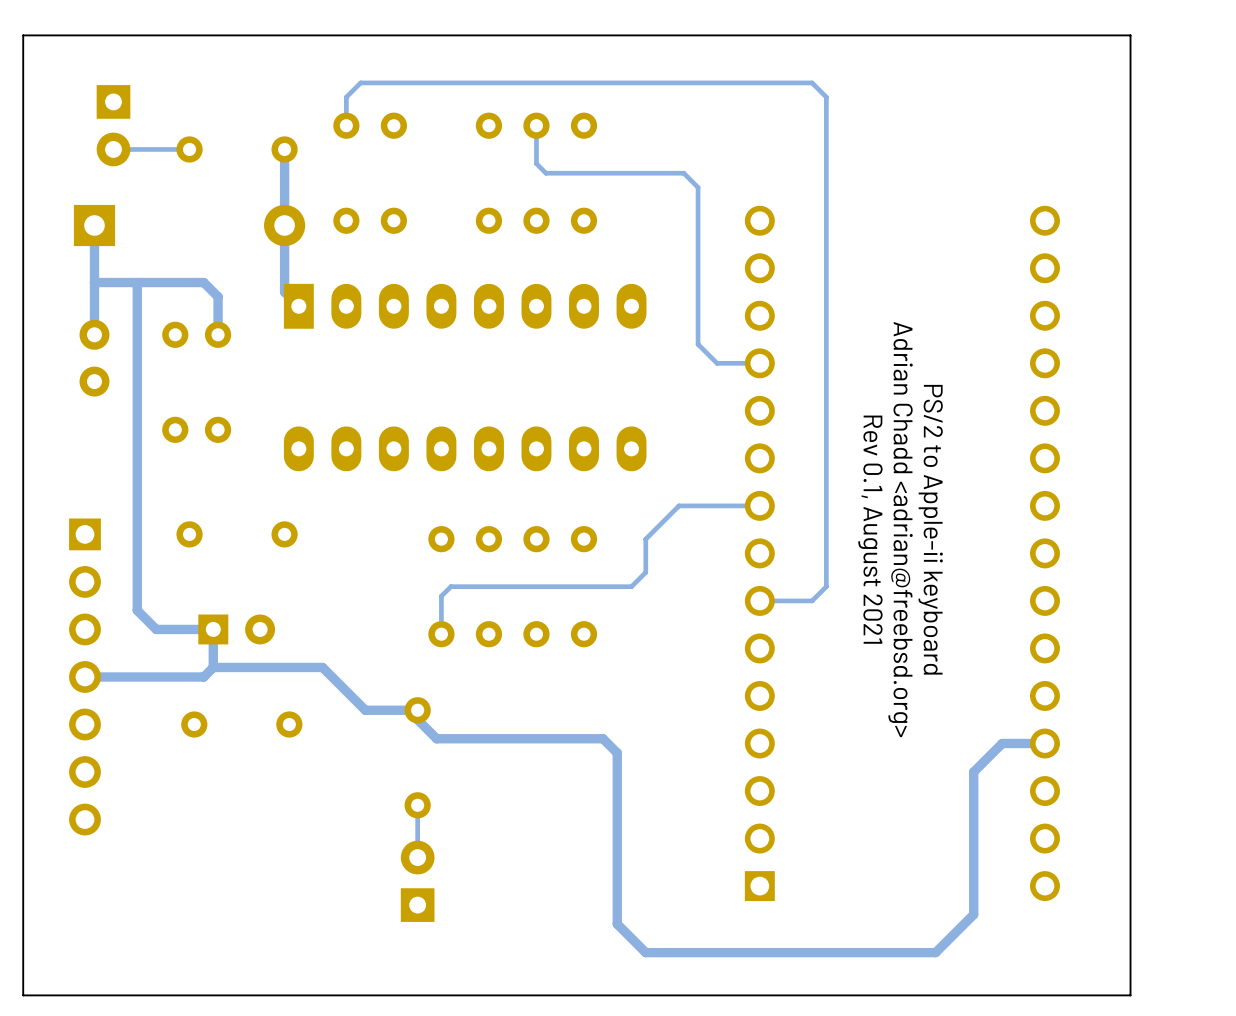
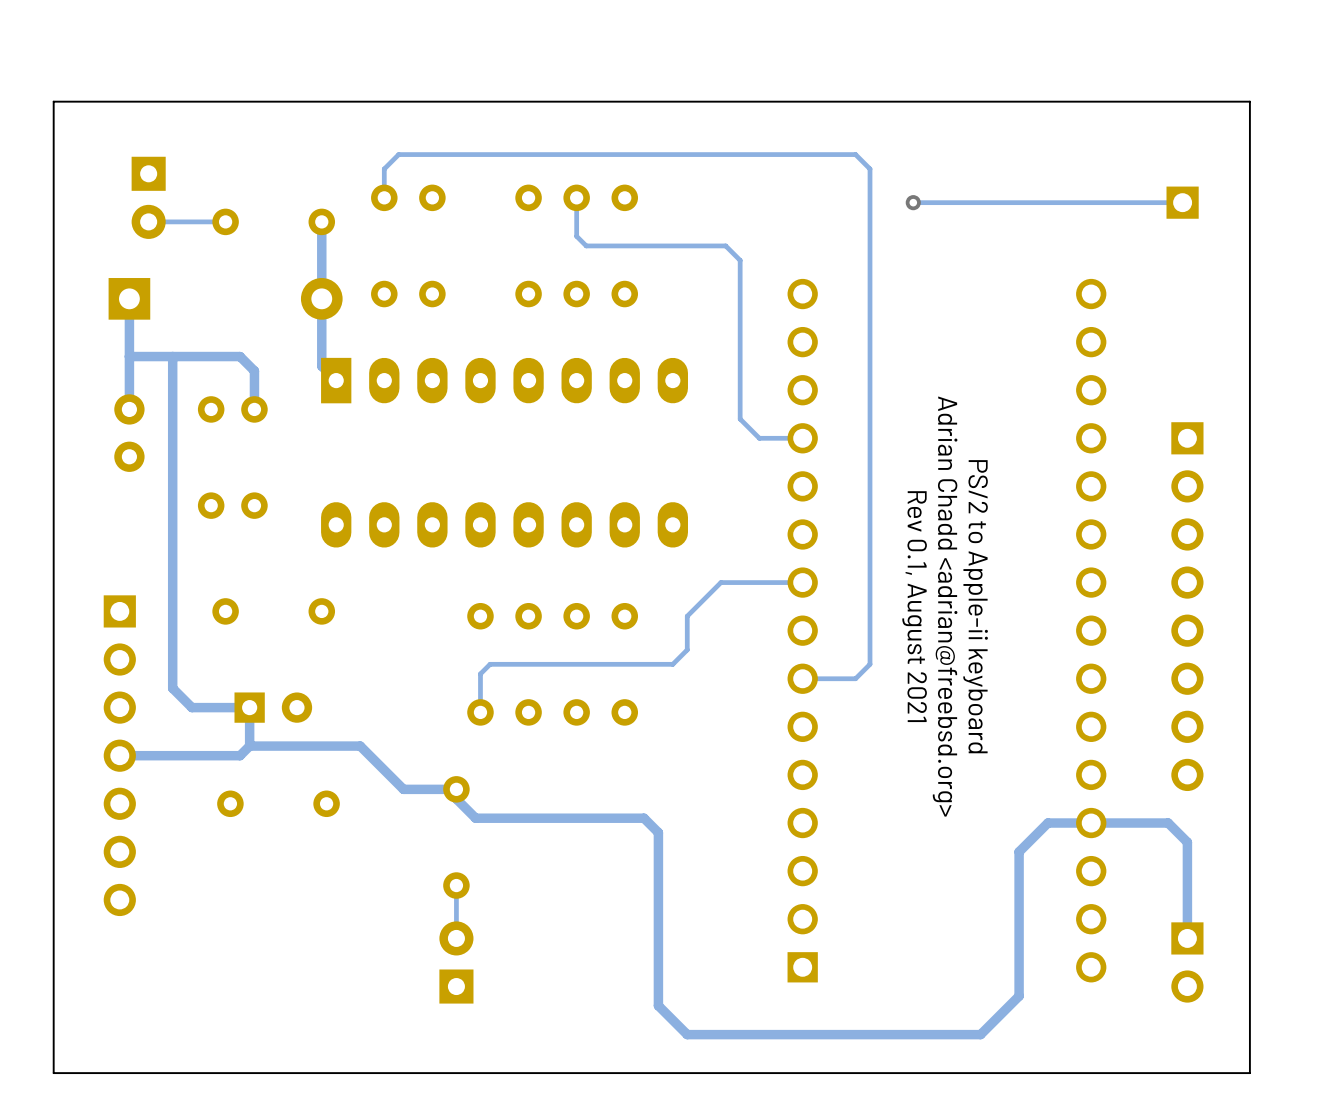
board edge: (1130, 35) (23, 35) (23, 995) (1130, 995) (1130, 35) -> (1249, 101) (1249, 1073) (53, 1073) (53, 101) (1249, 101)
via: none -> (913, 202)
track: none -> (1182, 202) (913, 202)
part: none -> (1182, 202)
part: none -> (1187, 606)
track: none -> (1091, 823) (1168, 823) (1187, 842) (1187, 938)
part: none -> (1187, 962)

